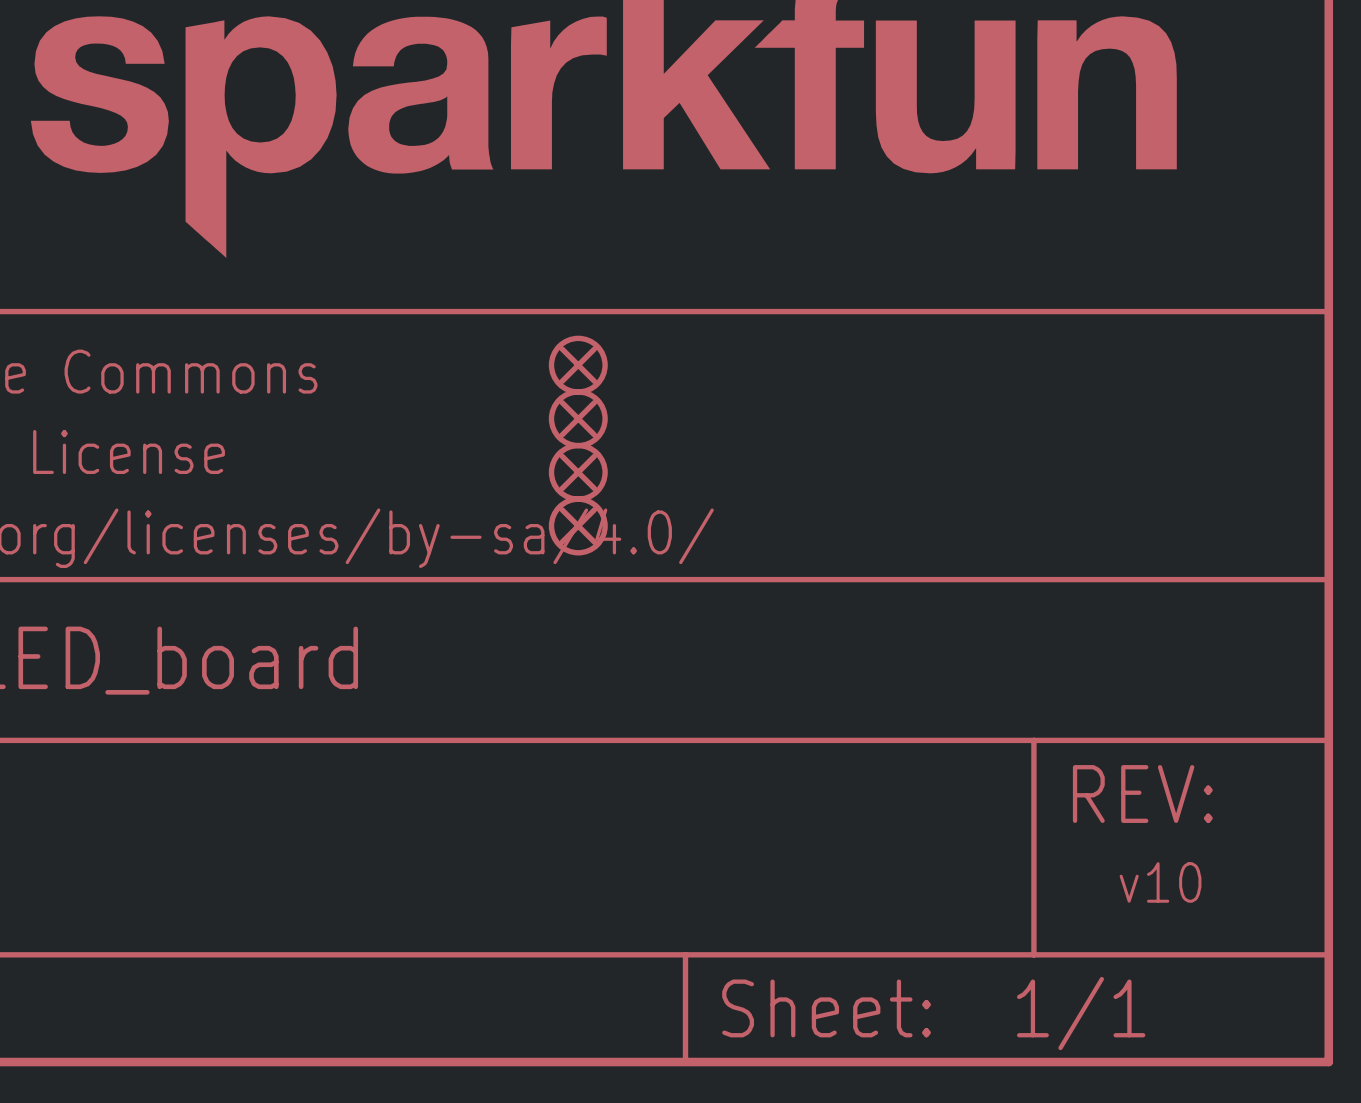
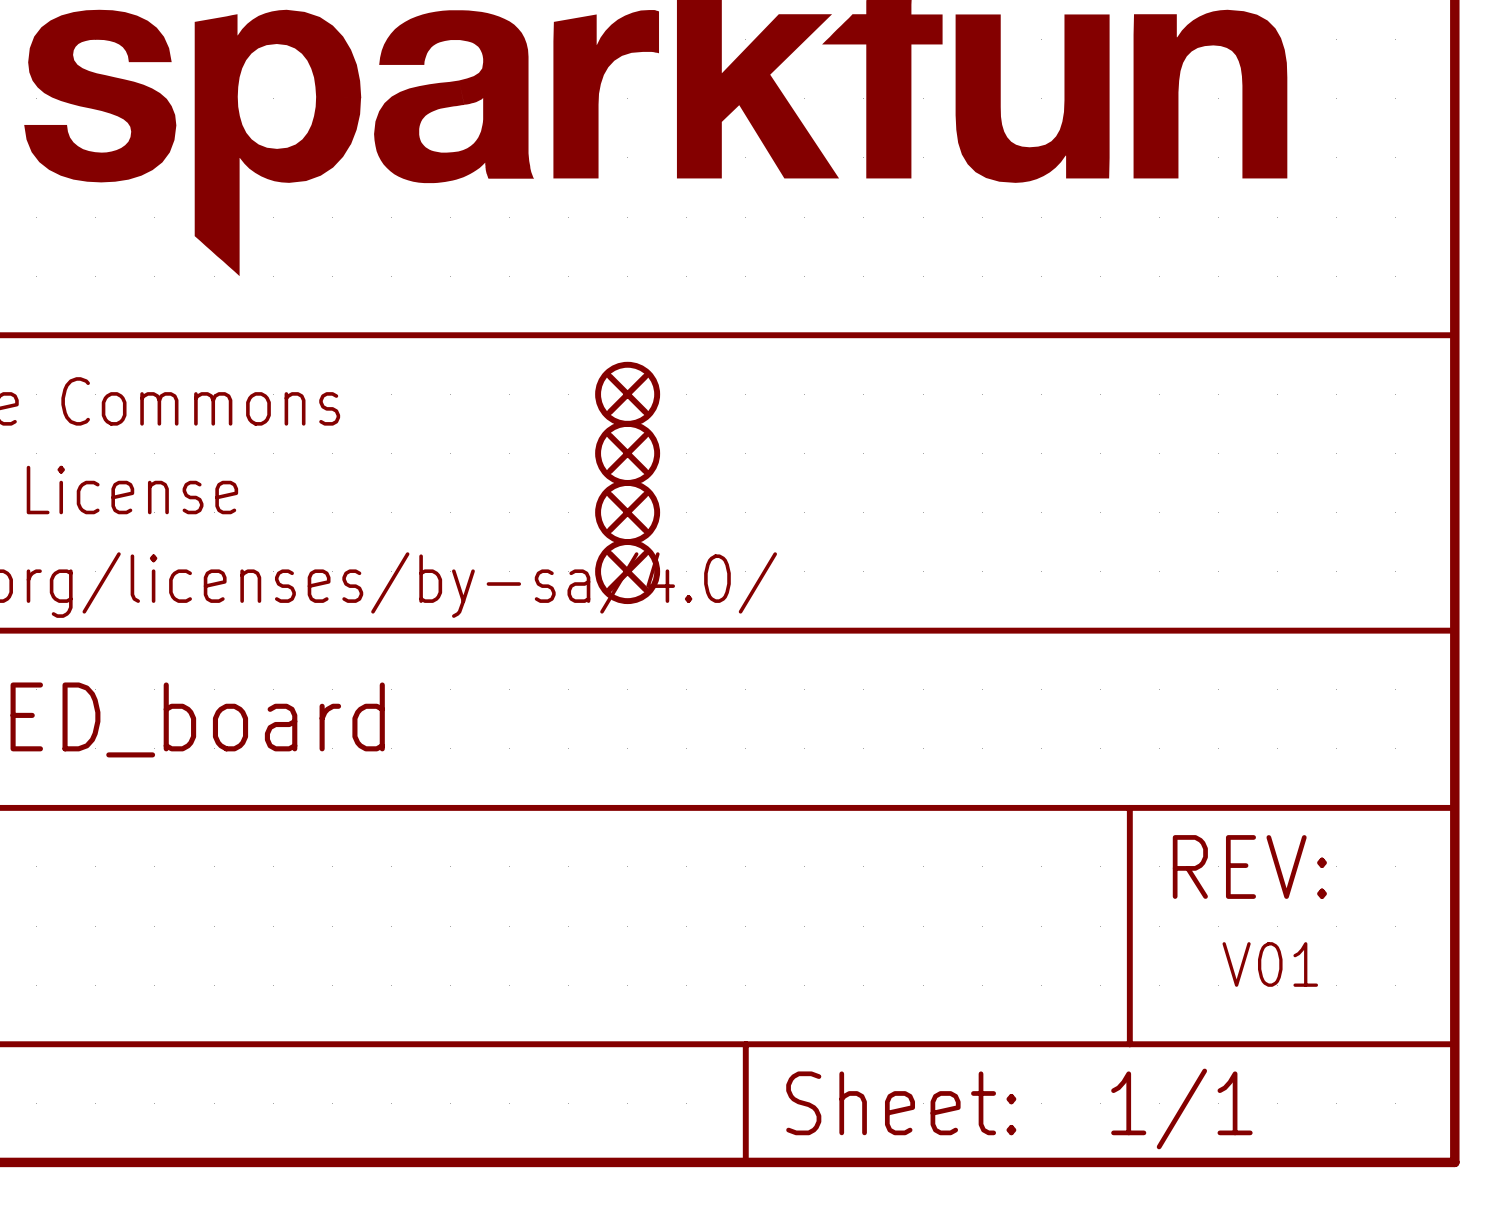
text: v10 (1160, 882) -> V01 (1270, 964)

